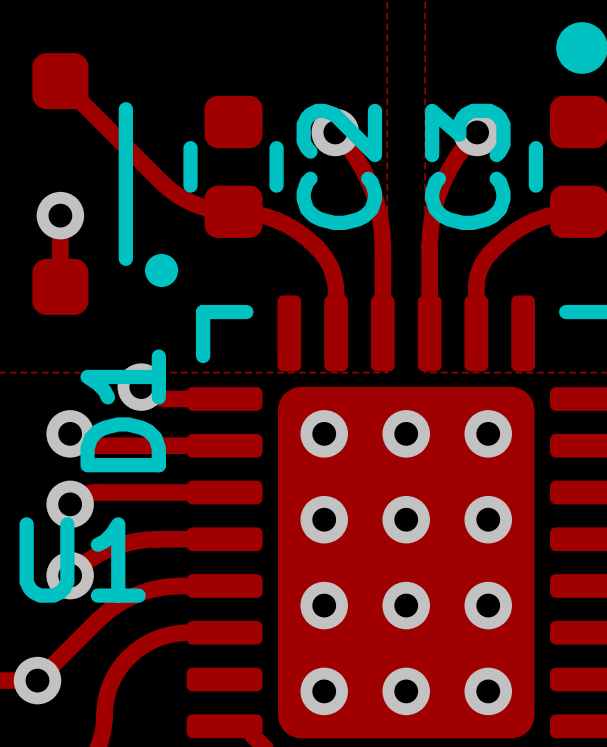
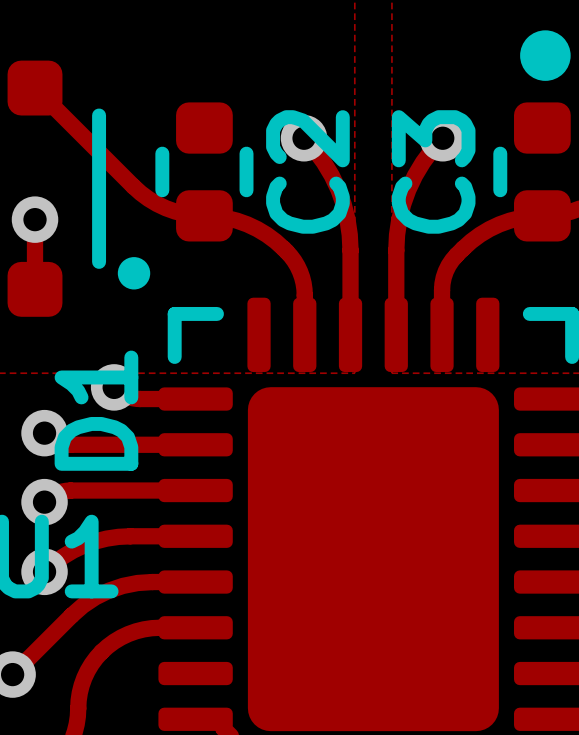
via: (324, 433) -> none
via: (406, 433) -> none
via: (488, 433) -> none
via: (324, 519) -> none
via: (406, 519) -> none
via: (488, 519) -> none
via: (324, 605) -> none
via: (406, 605) -> none
via: (488, 605) -> none
via: (324, 691) -> none
via: (406, 691) -> none
via: (488, 691) -> none

